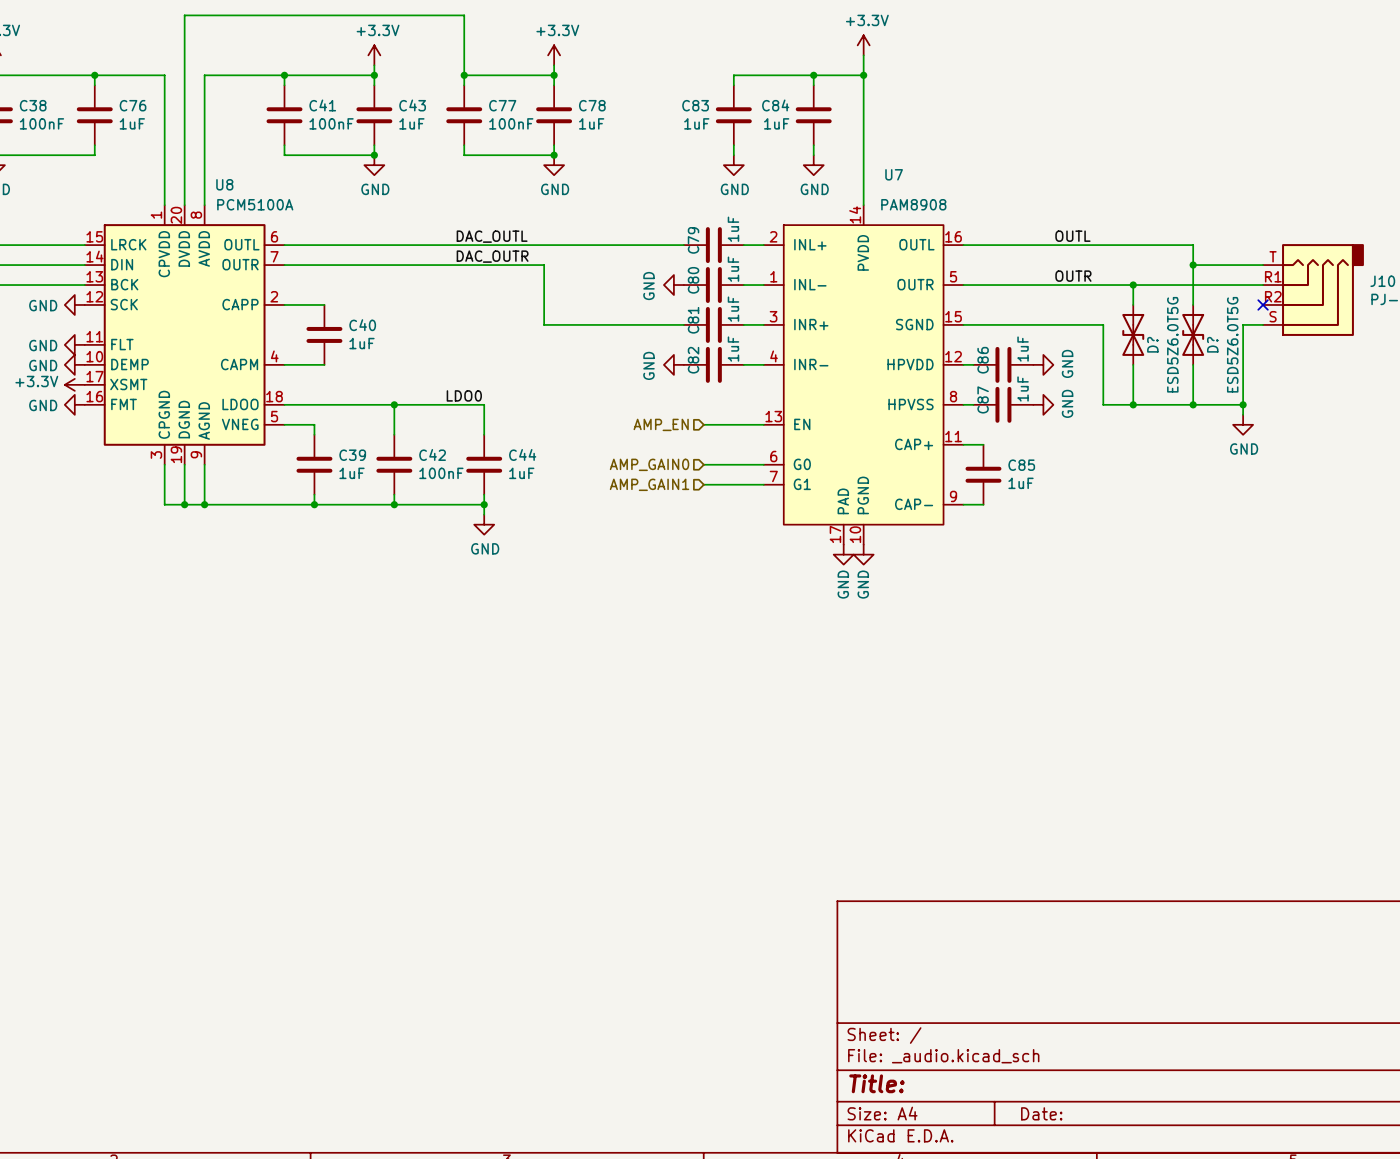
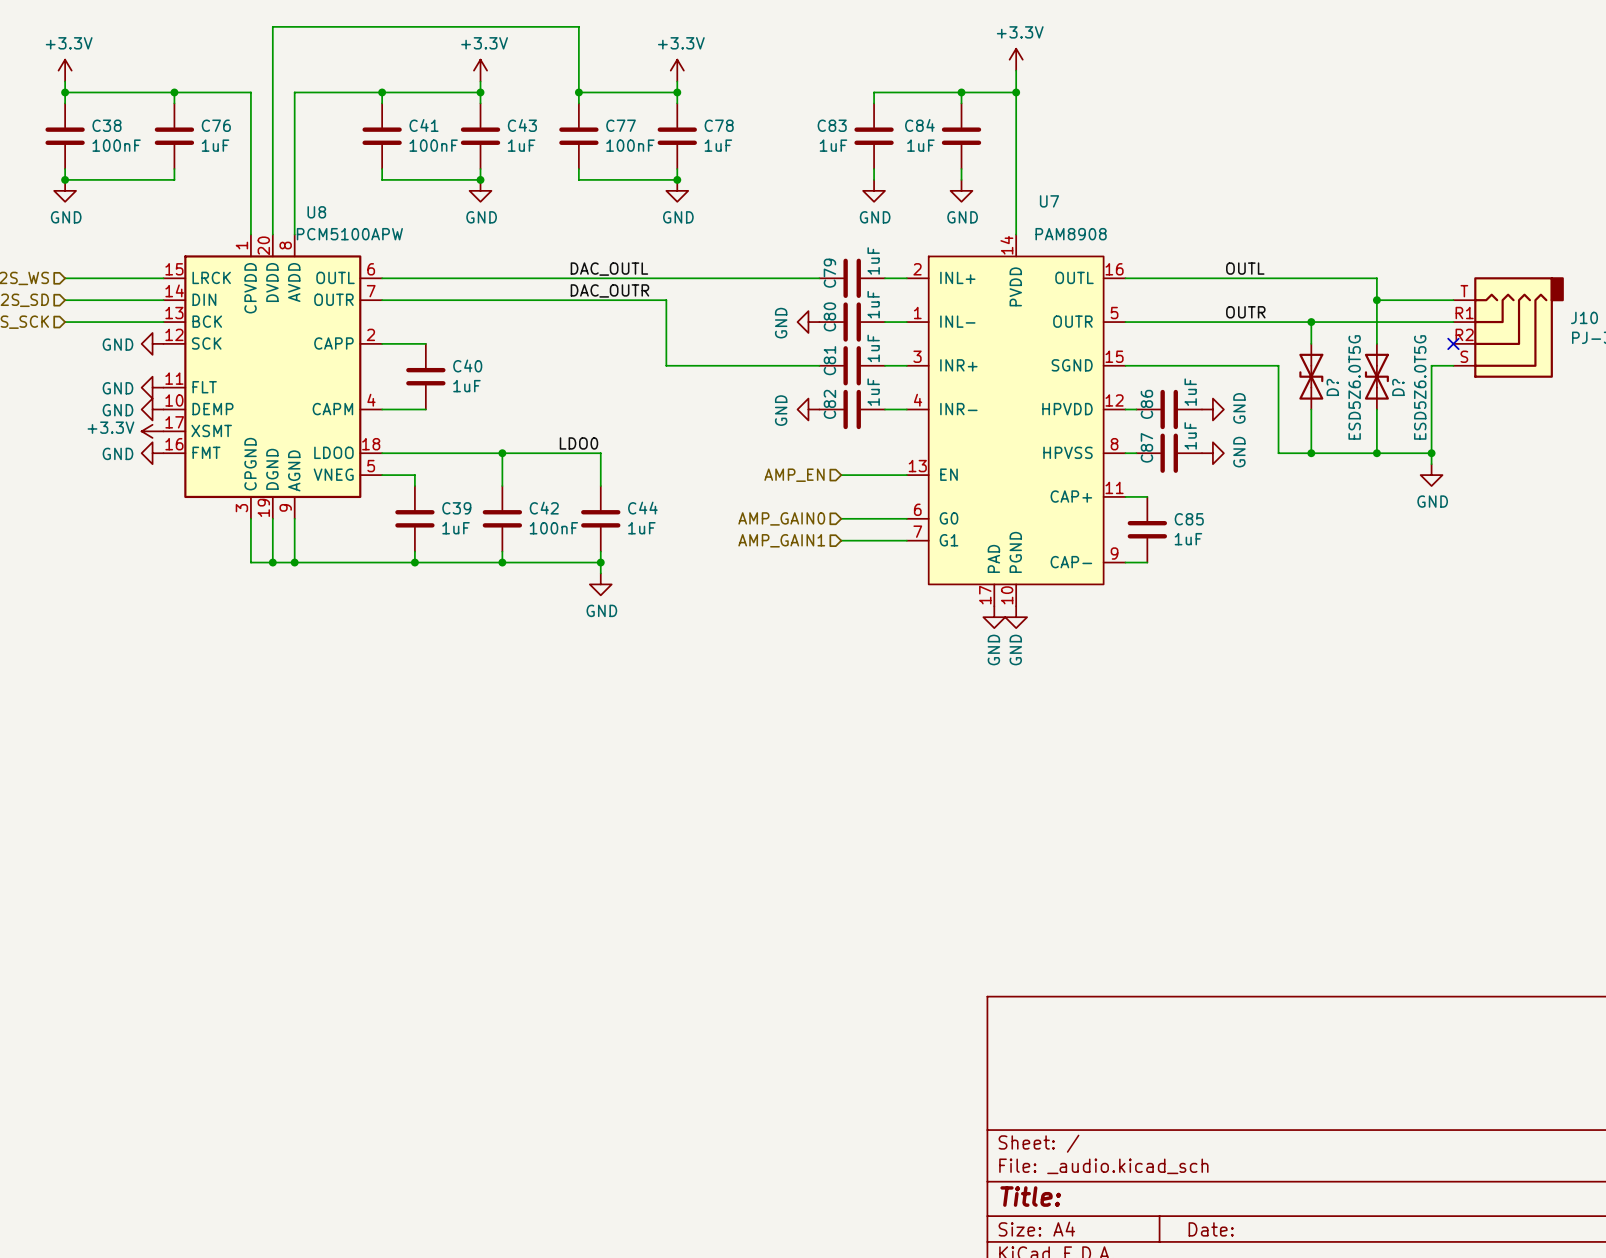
U8 value: PCM5100A (255, 204) -> PCM5100APW (349, 234)

